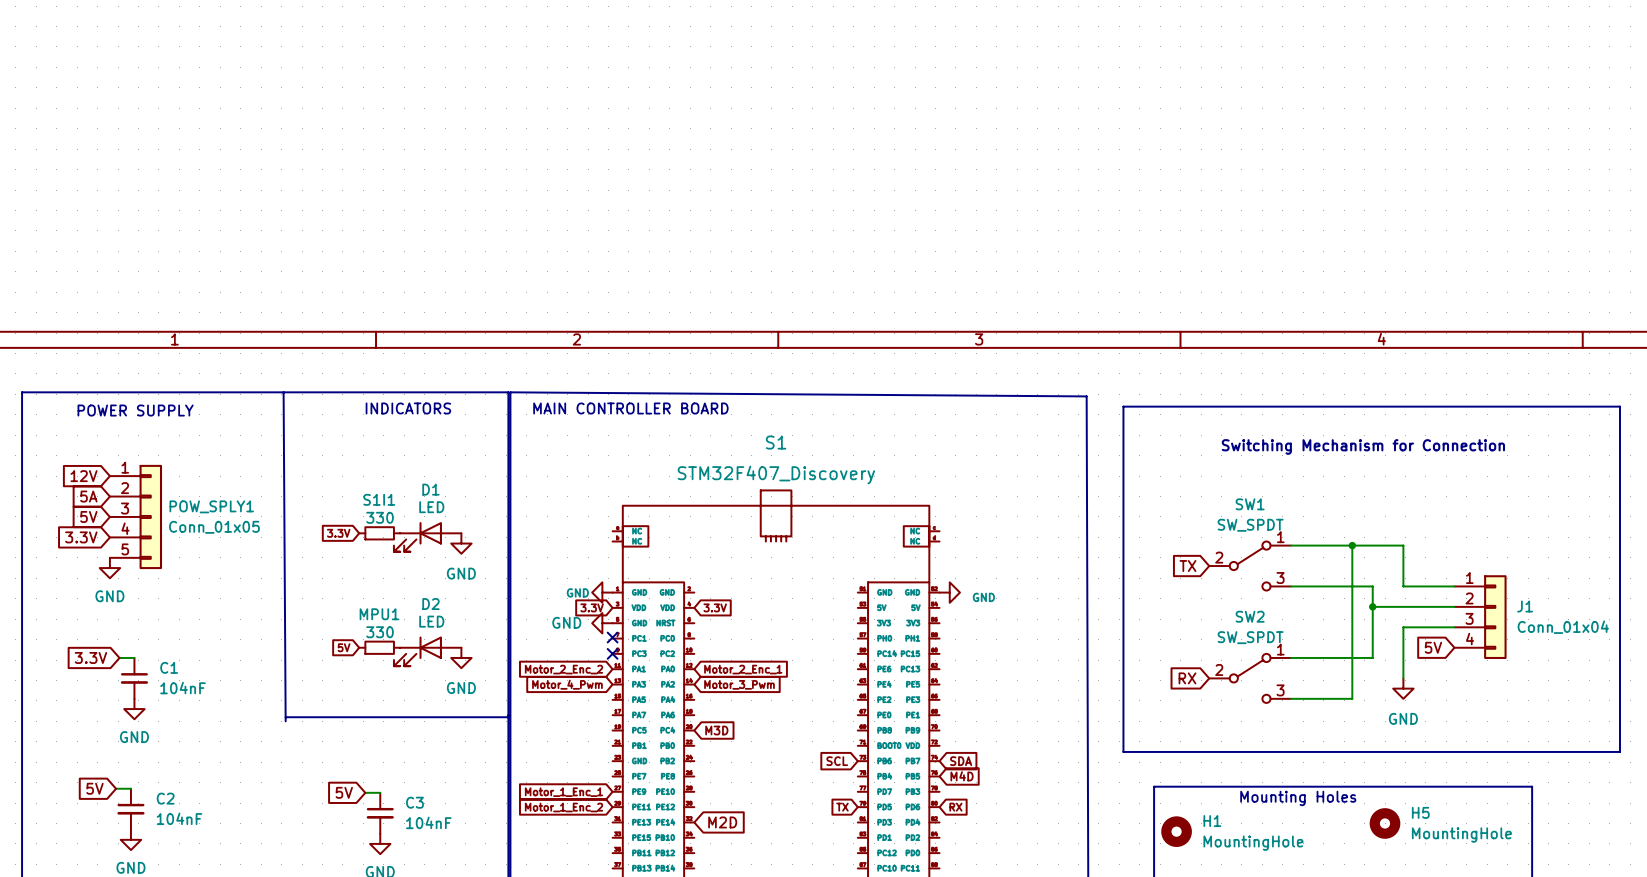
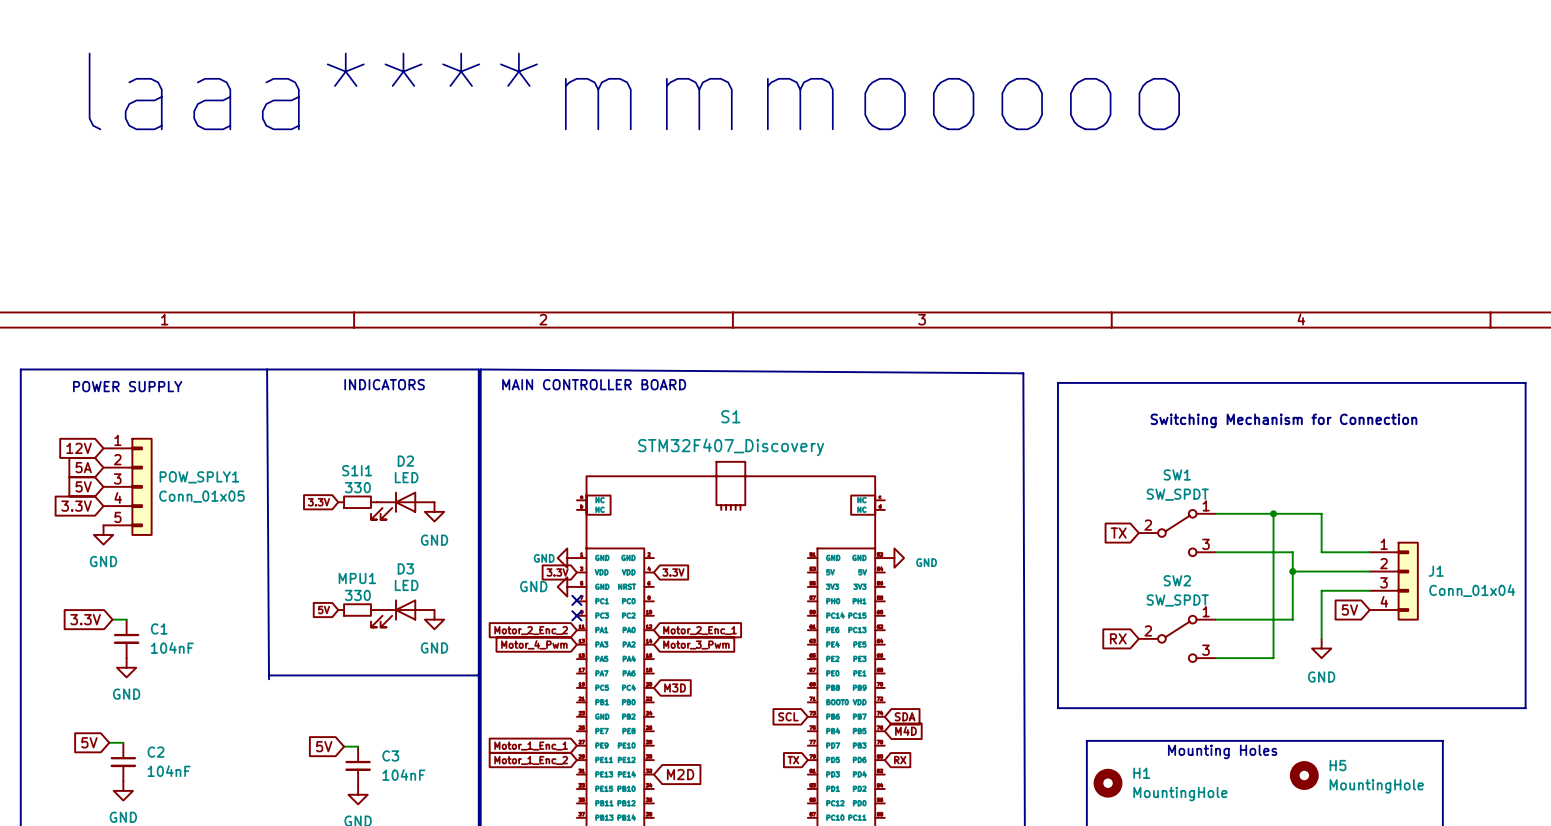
text: none -> laaa****mmmooooo (634, 91)
D1 name: D1 (430, 489) -> D2 (405, 461)
D2 name: D2 (430, 604) -> D3 (405, 568)

